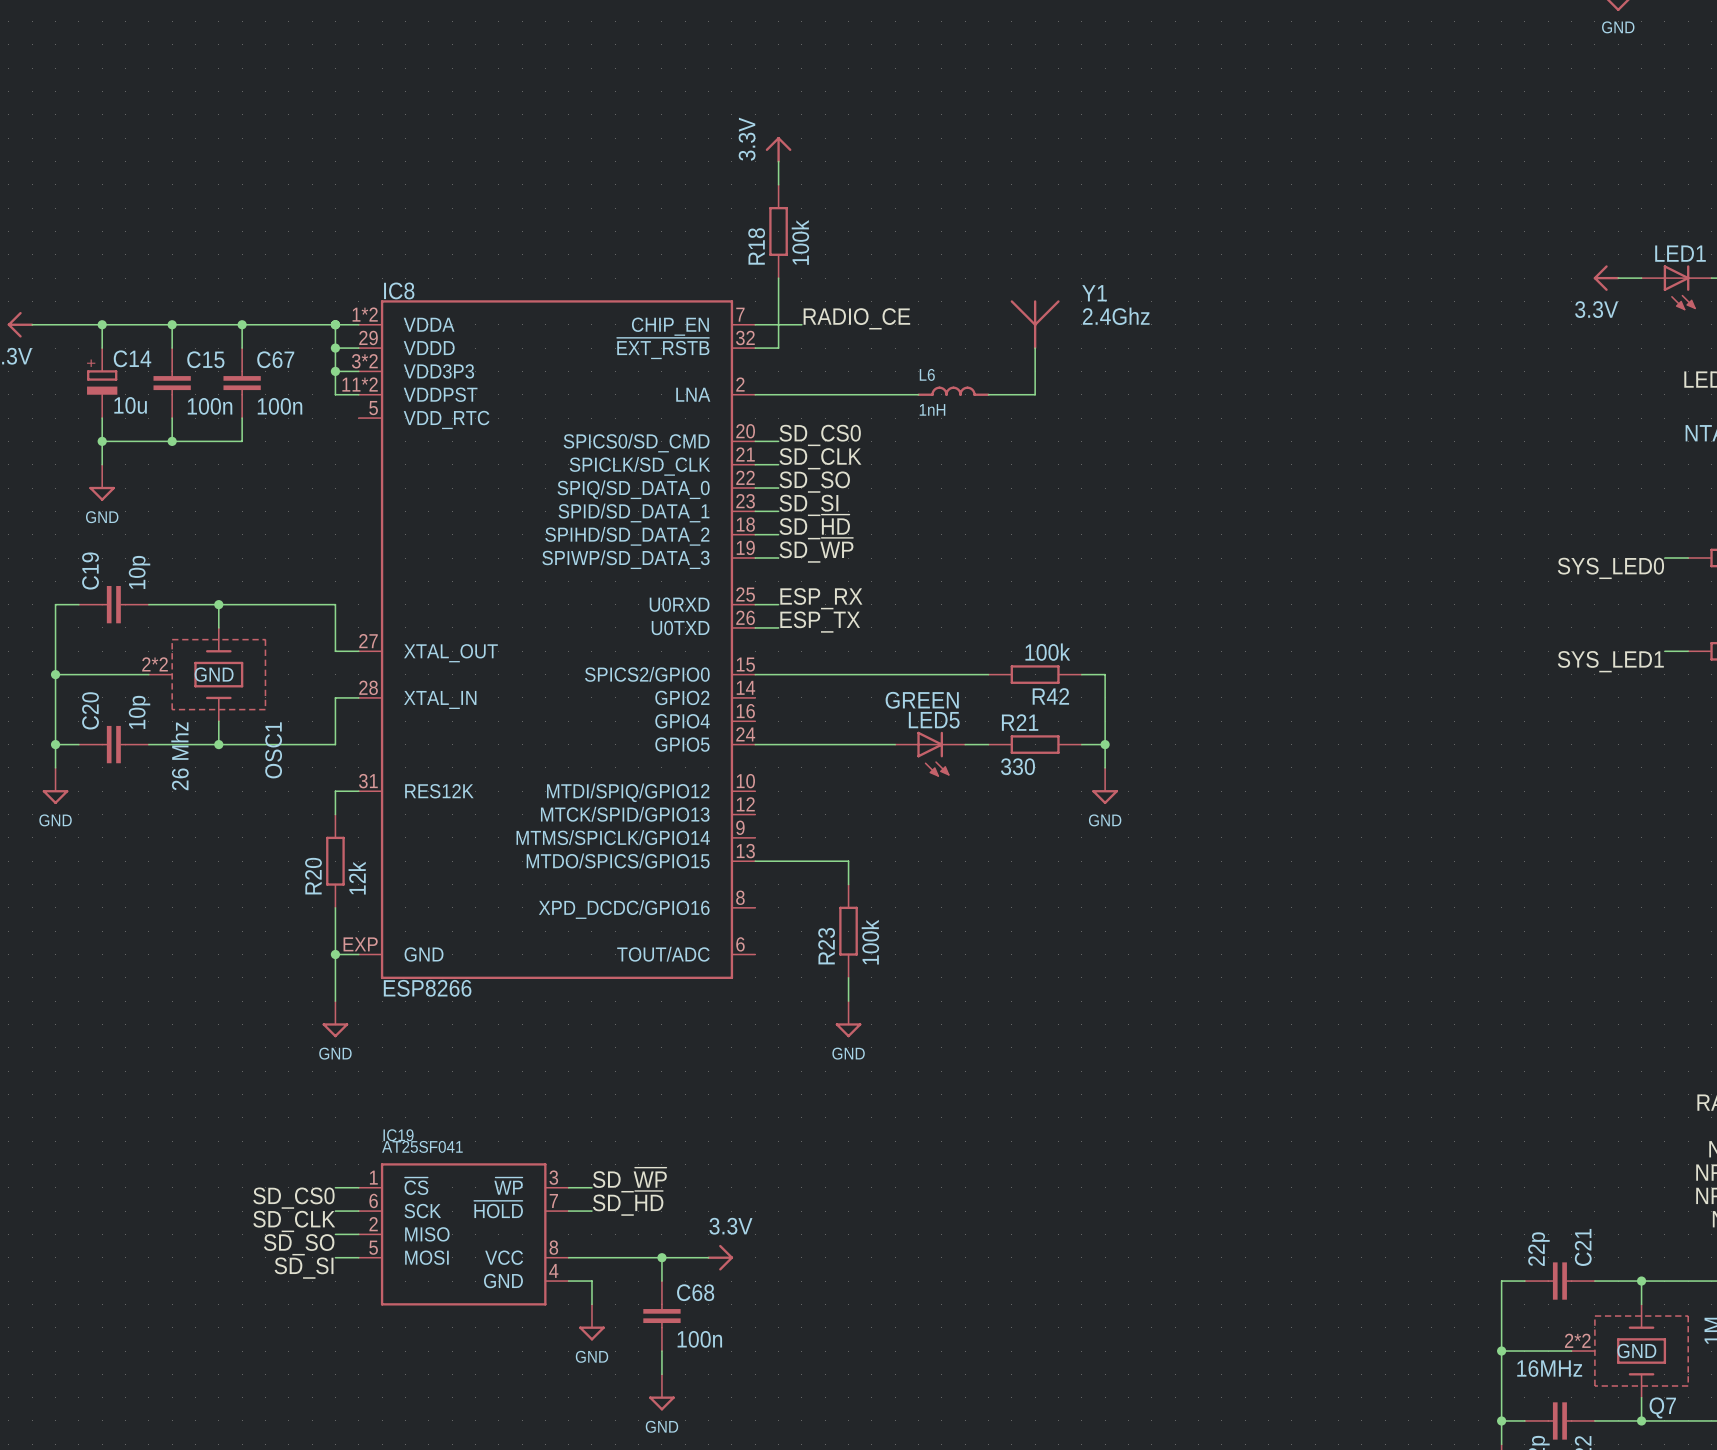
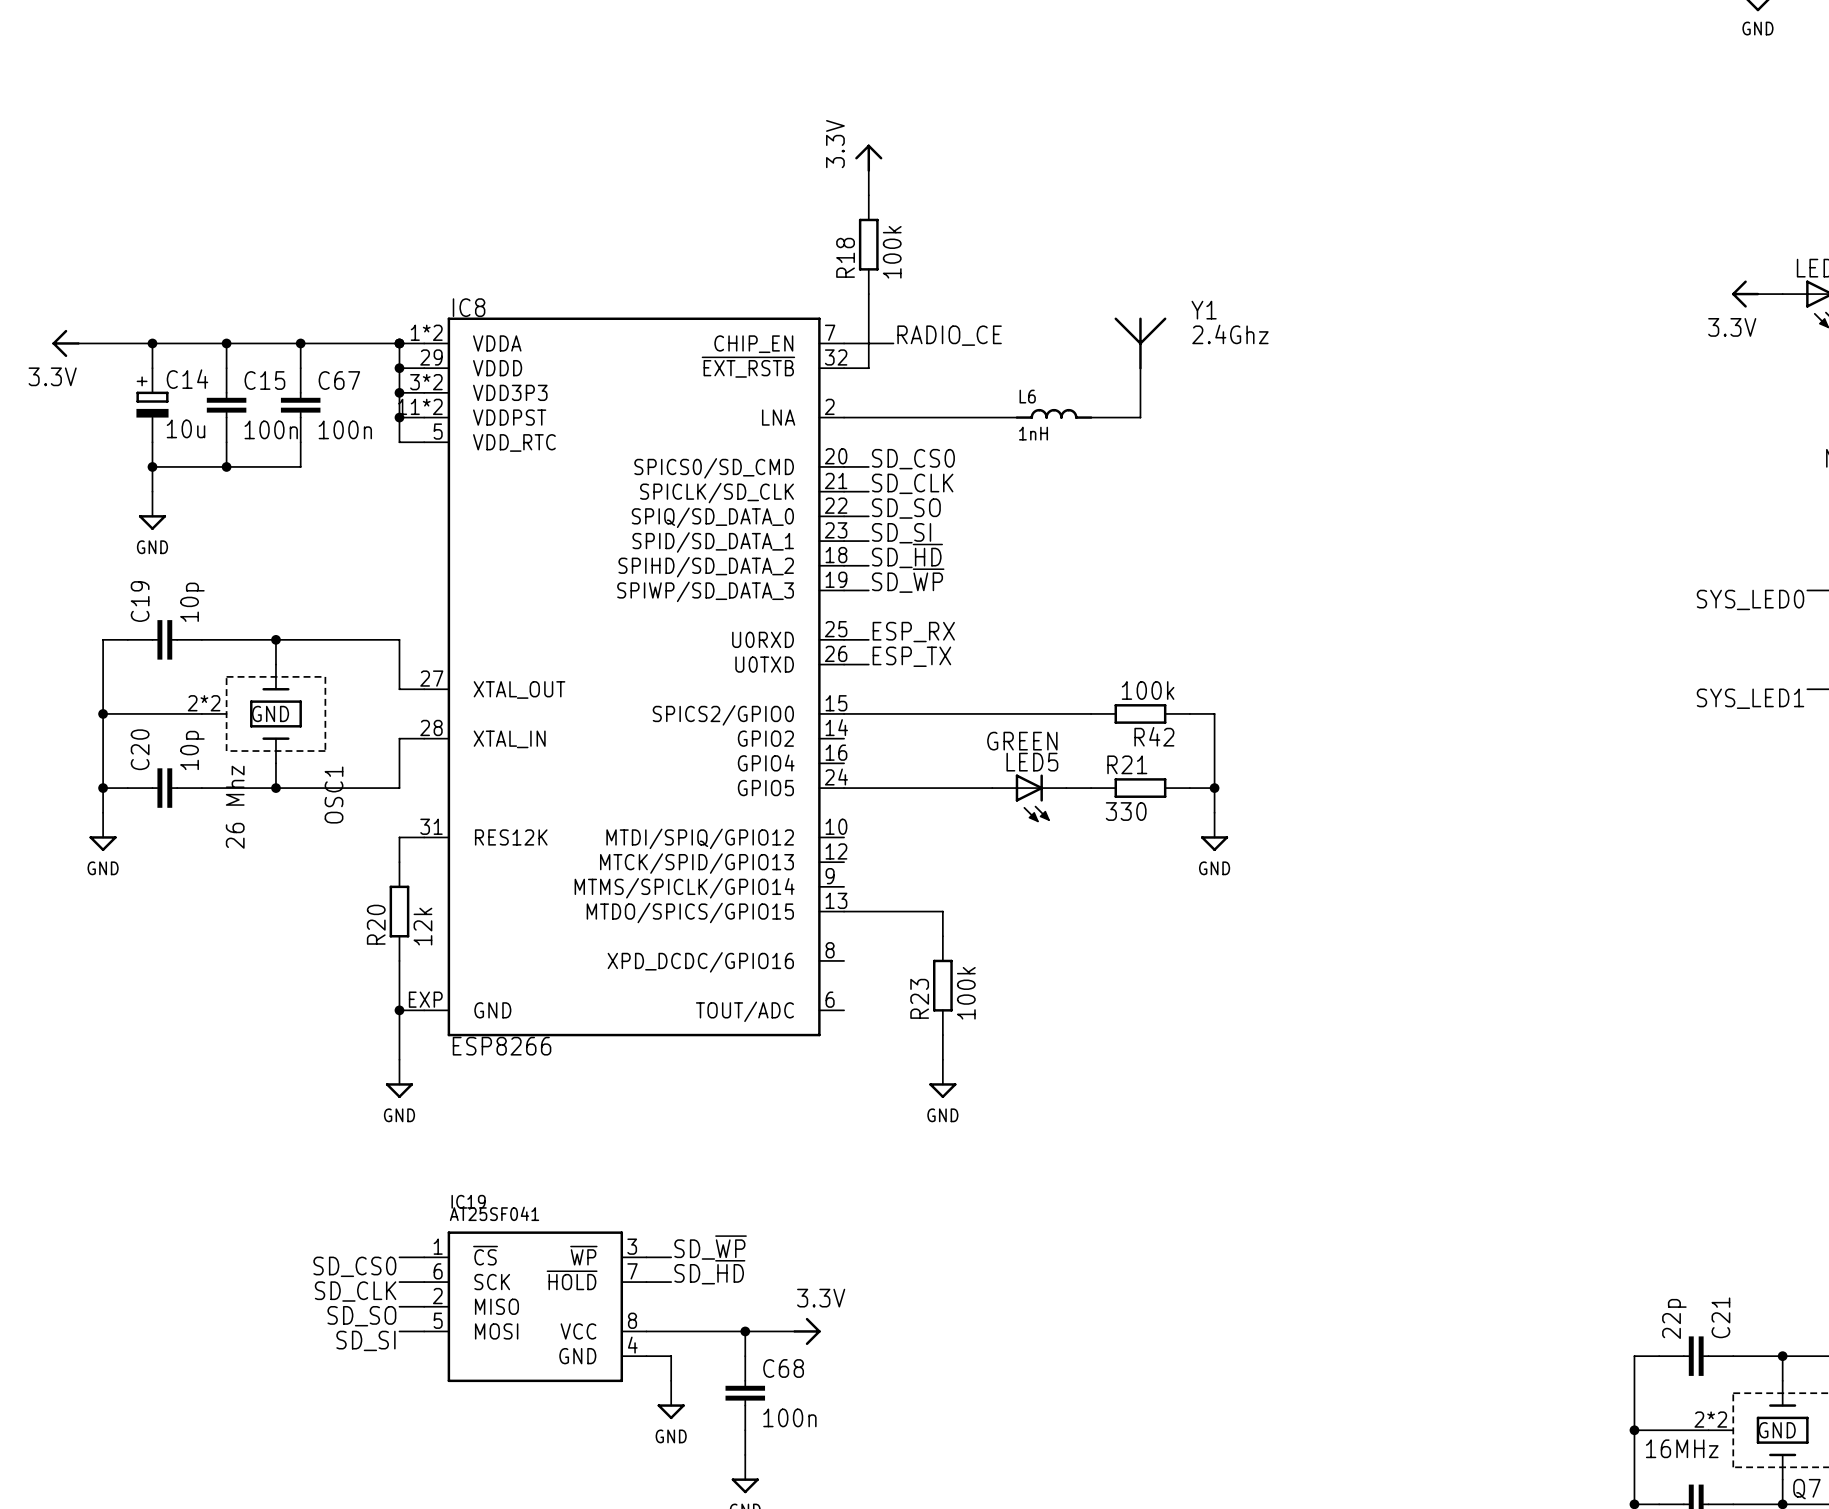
wire: none -> (399, 417) (399, 442) (424, 442)
junction: none -> (399, 417)

